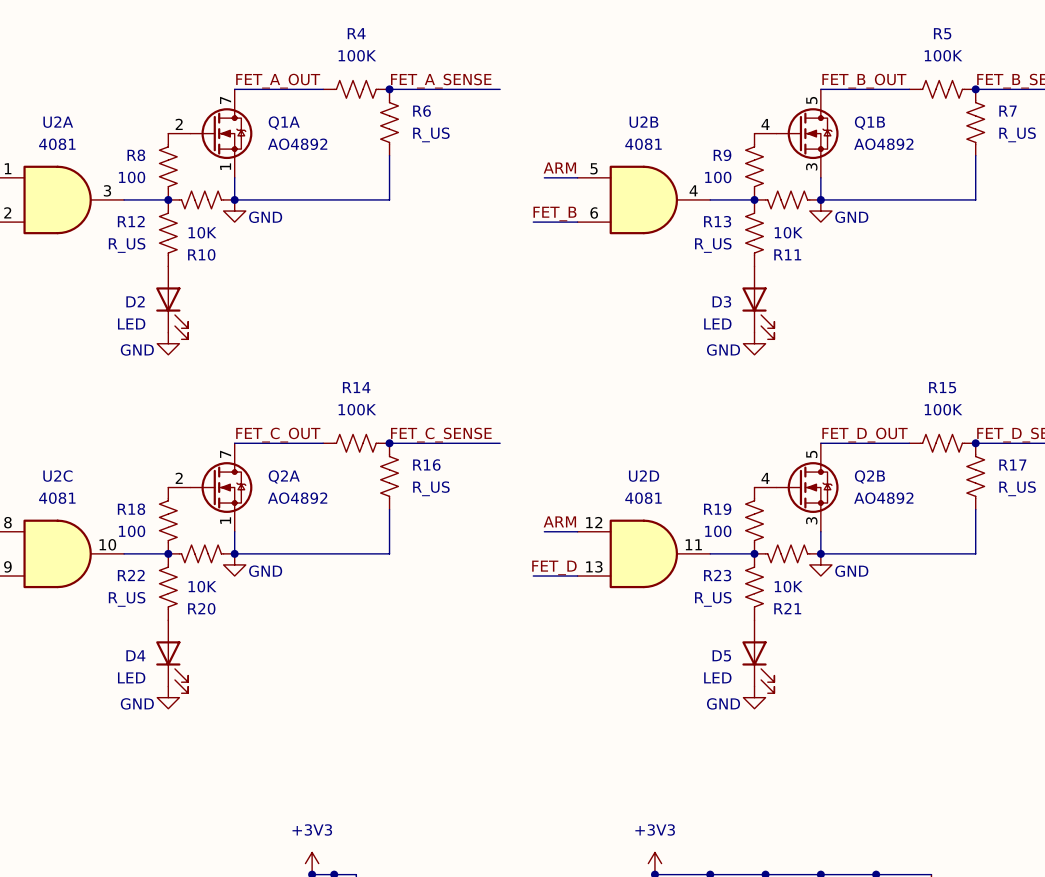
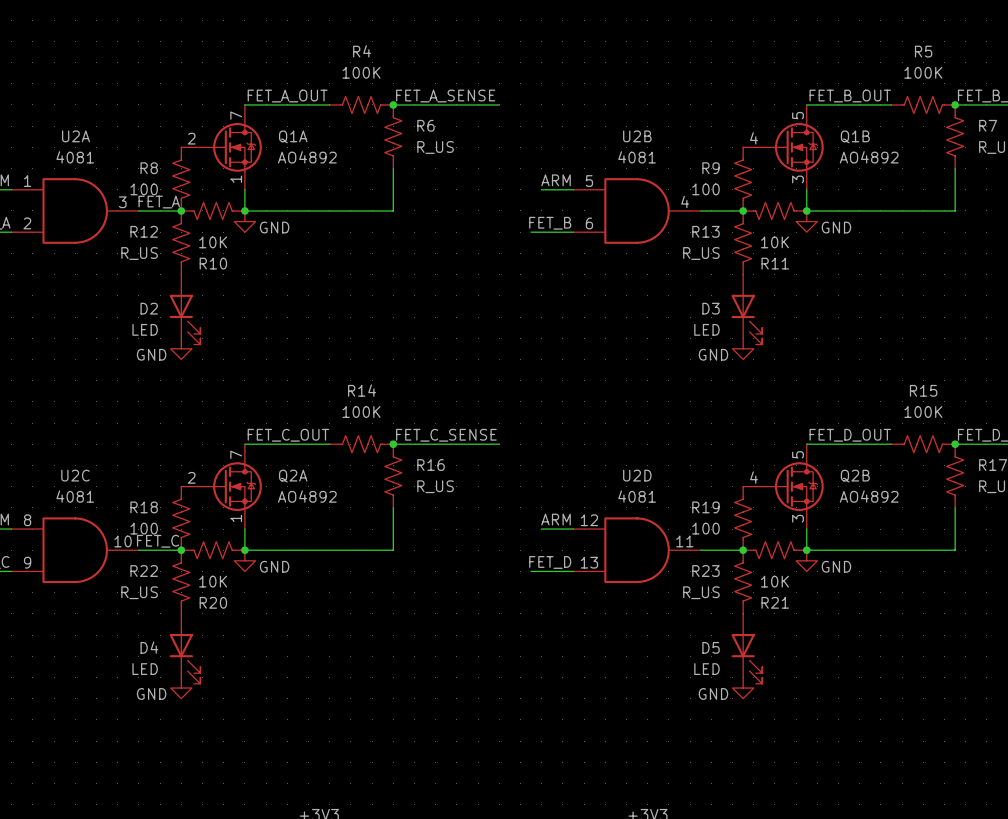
label: none -> FET_A (159, 202)
label: none -> FET_C (158, 541)

